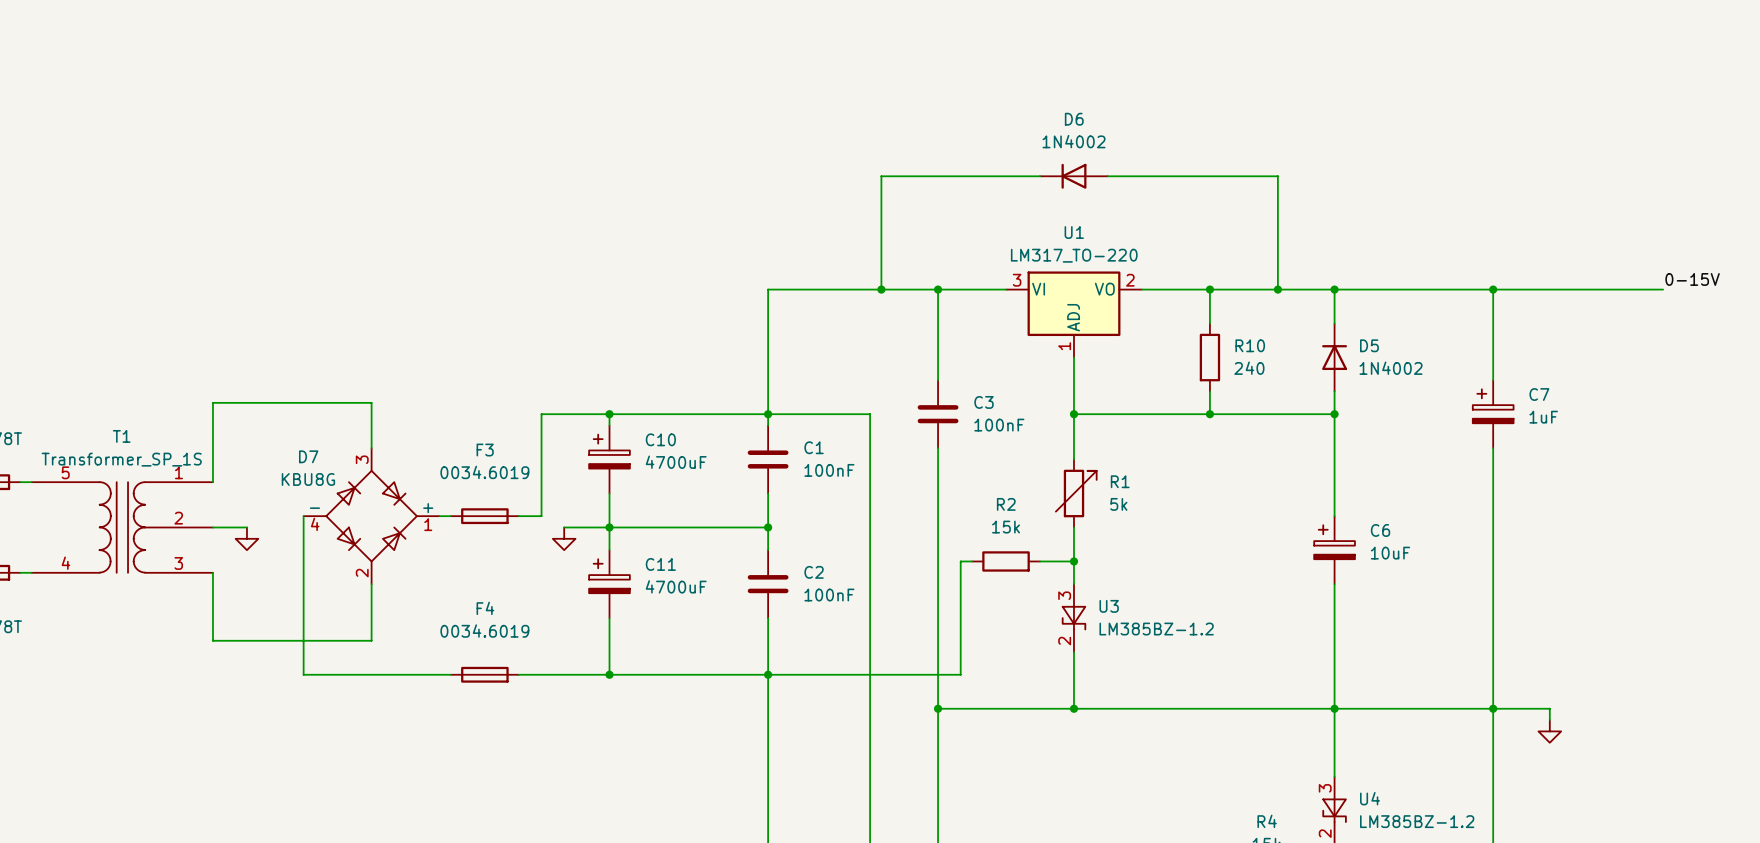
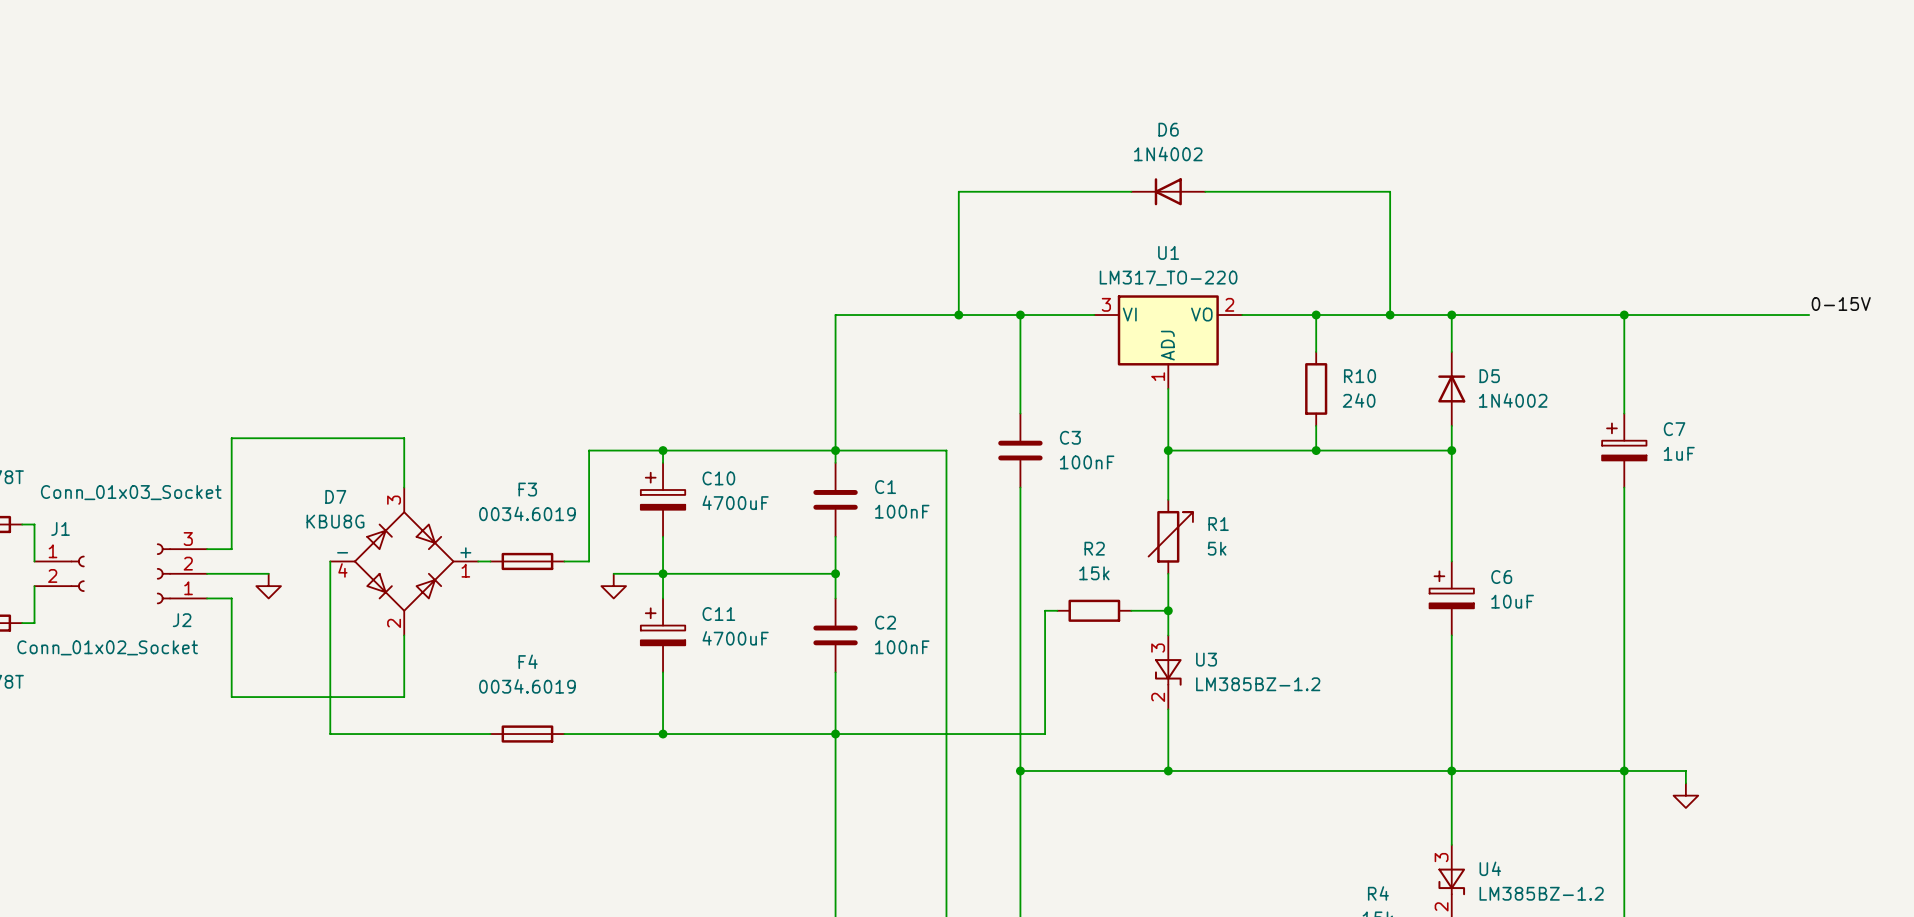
wire: none -> (34, 524) (34, 561)
wire: none -> (231, 524) (231, 549) (207, 549)
J1: none -> Conn_01x02_Socket (59, 573)
T1: Transformer_SP_1S (122, 527) -> none
J2: none -> Conn_01x03_Socket (182, 573)
wire: none -> (34, 586) (34, 623)
wire: none -> (207, 598) (231, 598) (231, 623)

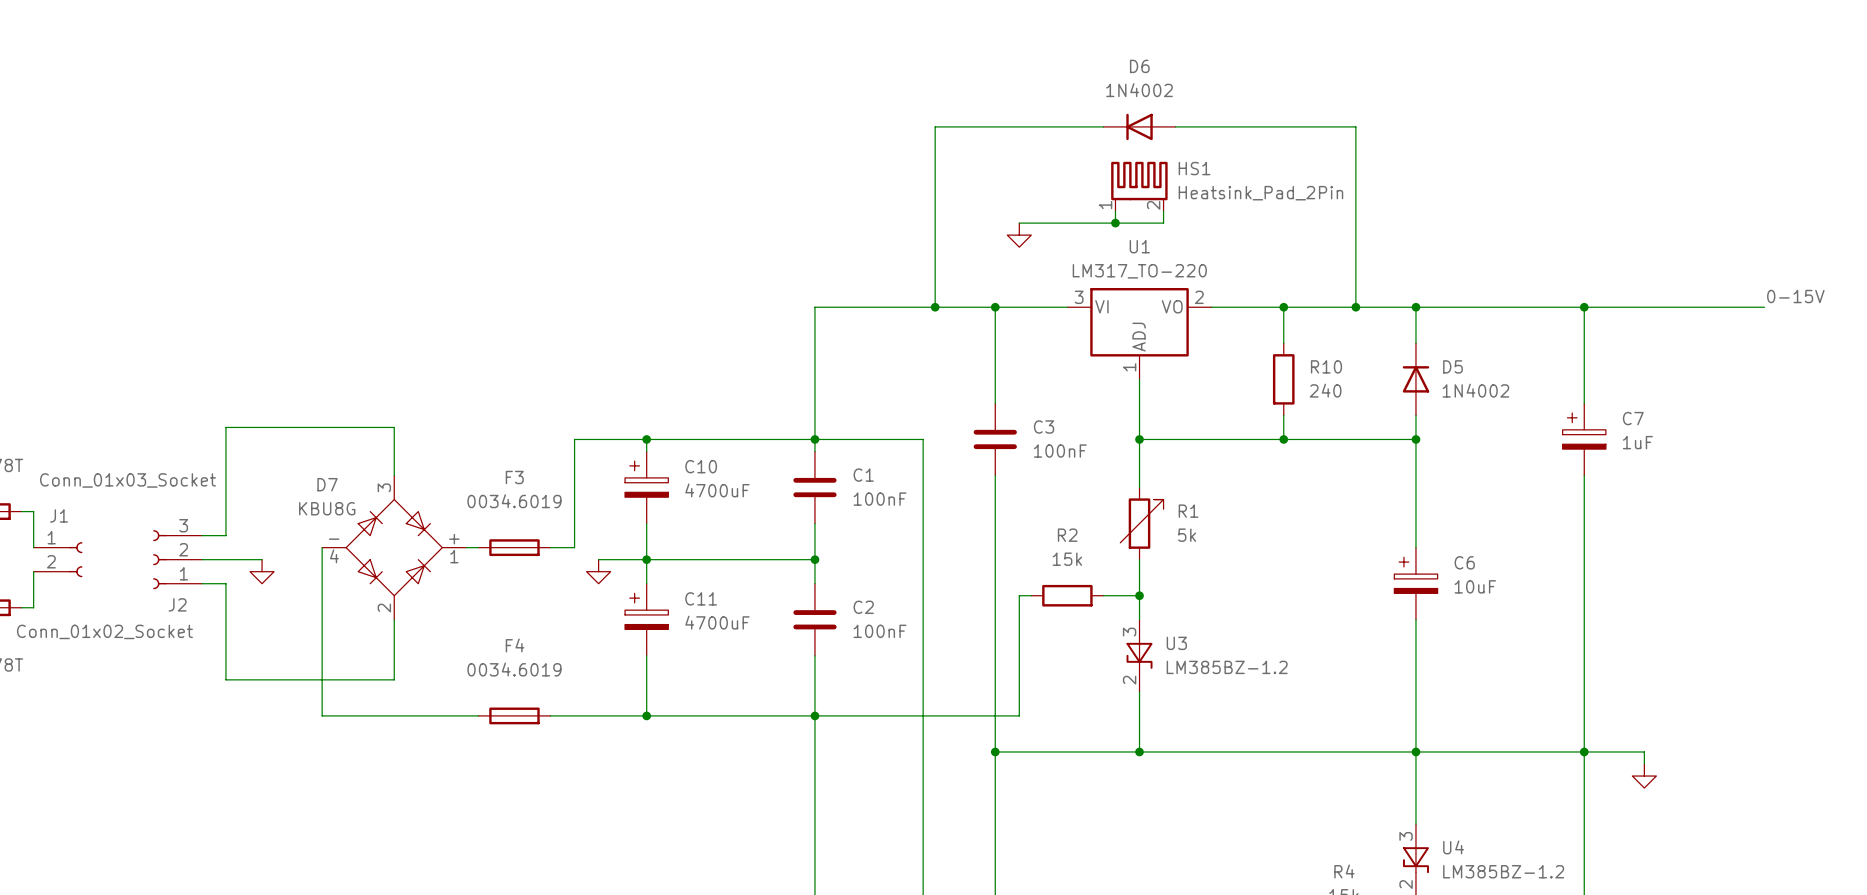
wire: (958, 191) (1131, 191) -> (935, 187) (935, 126) (1103, 126)
D6 position: (1168, 191) -> (1139, 126)
HS1: none -> Heatsink_Pad_2Pin (1139, 186)
wire: (1205, 191) (1390, 191) -> (1175, 126) (1355, 126) (1355, 187)
wire: none -> (1115, 211) (1115, 223)
wire: none -> (1163, 211) (1163, 223) (1019, 223)
junction: none -> (1115, 223)
power symbol: none -> (1019, 235)

